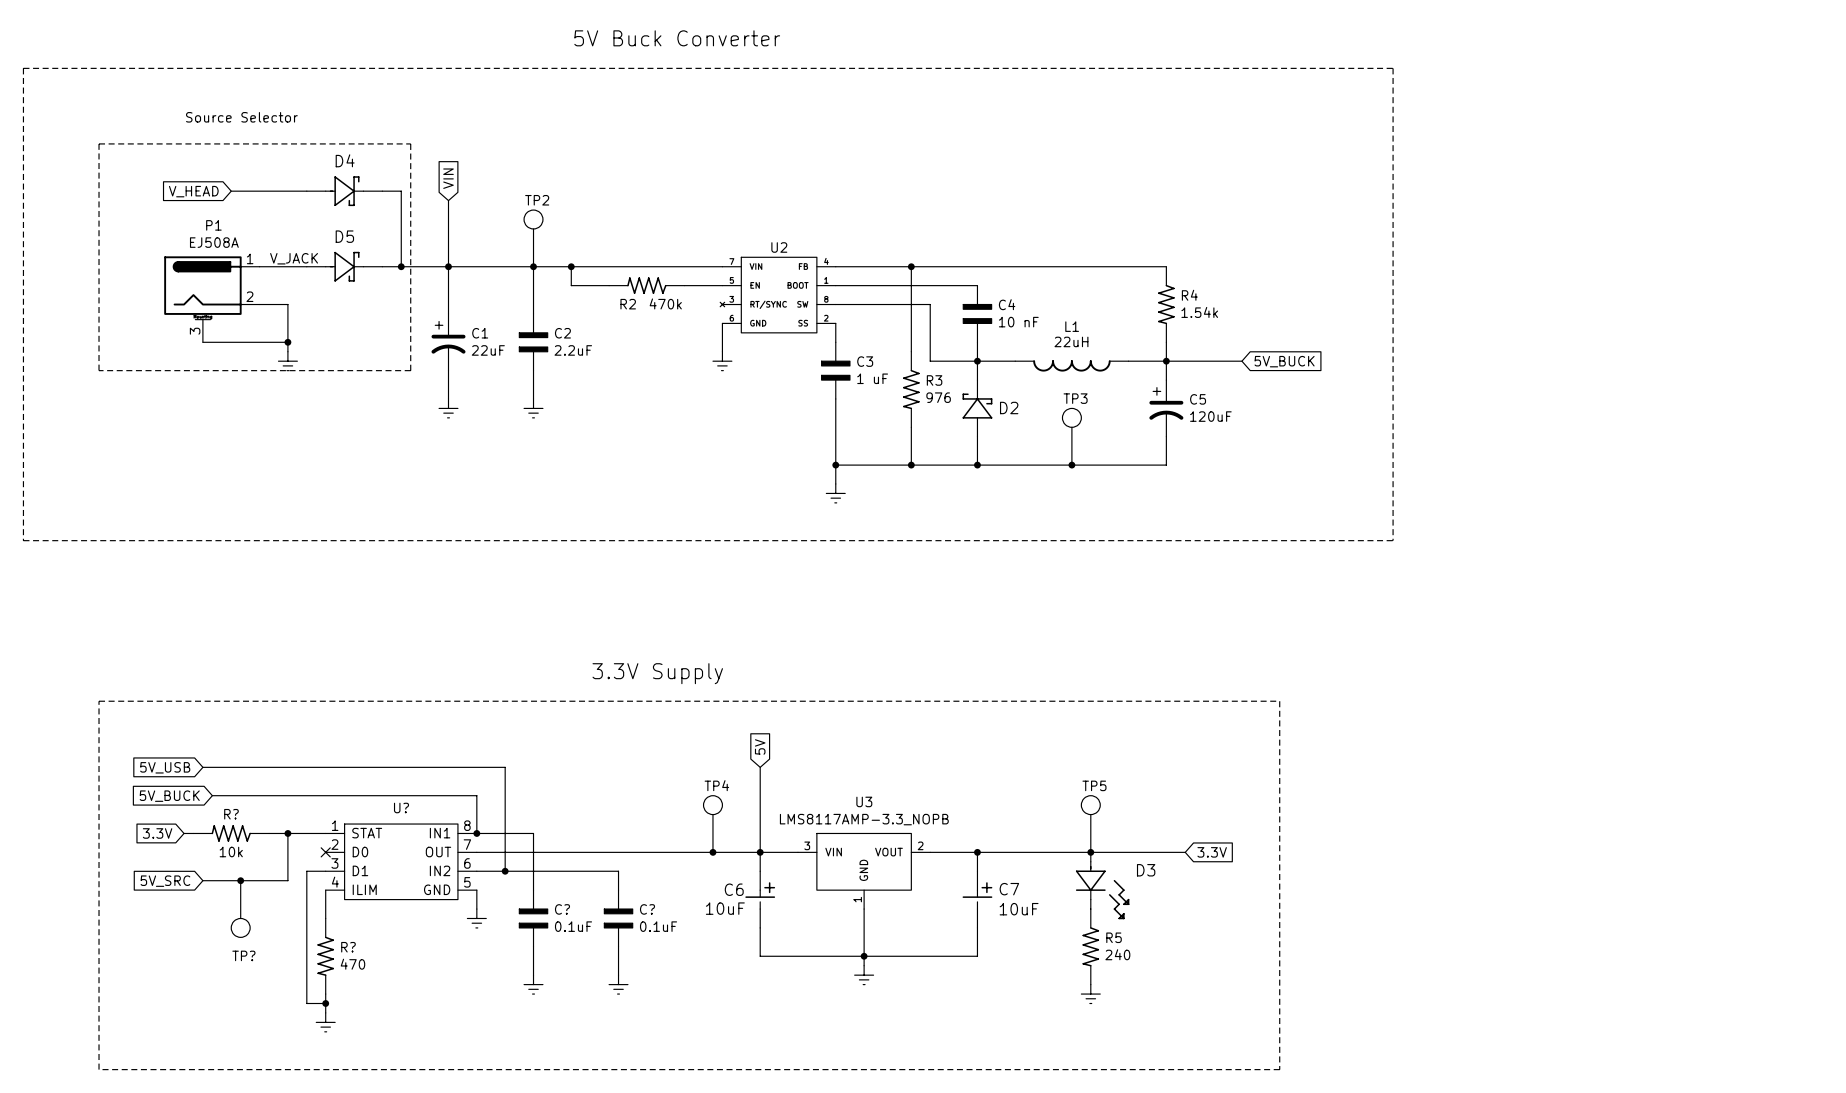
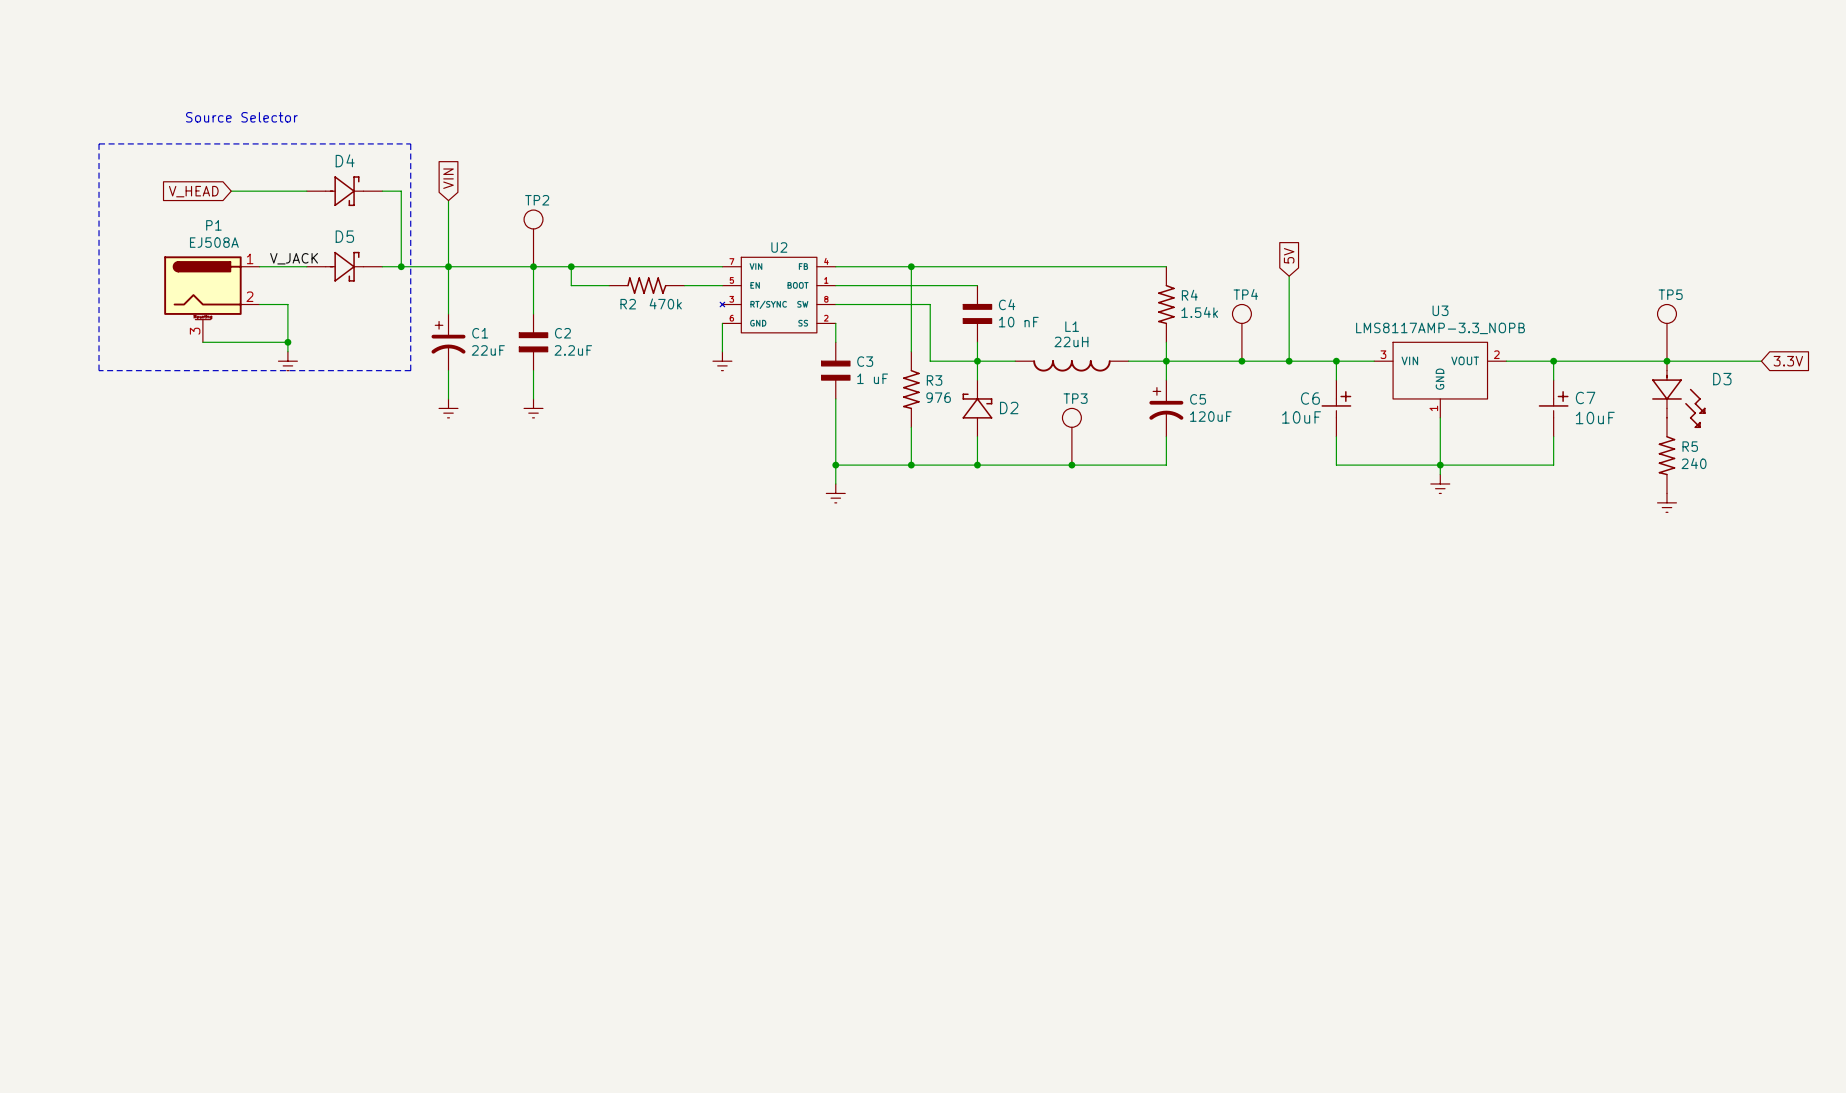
text: 5V Buck Converter (677, 38) -> none
line: (23, 68) (1393, 68) (1393, 540) (23, 540) (23, 68) -> none
global label: none -> 5V (1289, 255)
wire: none -> (1289, 276) (1289, 361)
wire: none -> (1241, 361) (1374, 361)
junction: none -> (1241, 361)
global label: 5V_BUCK (1284, 361) -> none
junction: none -> (1289, 361)
wire: none -> (1336, 361) (1336, 380)
junction: none -> (1336, 361)
wire: none -> (1506, 361) (1761, 361)
wire: none -> (1553, 361) (1553, 380)
junction: none -> (1553, 361)
junction: none -> (1666, 361)
global label: none -> 3.3V (1788, 361)
wire: none -> (1440, 417) (1440, 474)
wire: none -> (1336, 436) (1336, 465) (1553, 465) (1553, 436)
junction: none -> (1440, 465)
power symbol: none -> (1440, 483)
power symbol: none -> (1666, 502)
text: 3.3V Supply (657, 673) -> none
line: (99, 701) (99, 1069) (1279, 1069) (1279, 701) (99, 701) -> none
global label: 5V (760, 746) -> none
global label: 5V_USB (165, 767) -> none
wire: (202, 767) (505, 767) (505, 871) -> none
wire: (760, 767) (760, 871) -> none
wire: (212, 795) (476, 795) (476, 833) (533, 833) (533, 890) -> none
global label: 5V_BUCK (169, 796) -> none
TP4 position: (712, 824) -> (1241, 332)
TP5 position: (1090, 824) -> (1666, 332)
global label: 3.3V (157, 833) -> none
wire: (184, 833) (193, 833) -> none
R?: 10k (231, 833) -> none
wire: (269, 833) (325, 833) -> none
wire: (287, 833) (287, 880) (202, 880) -> none
junction: (287, 833) -> none
junction: (476, 833) -> none
no-connect mark: (325, 852) -> none
wire: (476, 852) (797, 852) -> none
junction: (712, 852) -> none
junction: (760, 852) -> none
wire: (930, 852) (1185, 852) -> none
wire: (977, 852) (977, 871) -> none
junction: (977, 852) -> none
junction: (1090, 852) -> none
global label: 3.3V (1212, 852) -> none
U?: (401, 861) -> none
wire: (325, 871) (306, 871) (306, 1003) (325, 1003) -> none
wire: (476, 871) (618, 871) (618, 890) -> none
junction: (505, 871) -> none
U3 position: (864, 871) -> (1440, 380)
junction: (240, 880) -> none
global label: 5V_SRC (165, 881) -> none
D3 position: (1102, 885) -> (1678, 394)
wire: (325, 890) (325, 918) -> none
wire: (476, 890) (476, 909) -> none
C6 position: (760, 899) -> (1336, 408)
C7 position: (977, 899) -> (1553, 408)
TP?: (240, 909) -> none
wire: (864, 909) (864, 965) -> none
power symbol: (476, 918) -> none
C?: 0.1uF (533, 918) -> none
C?: 0.1uF (618, 918) -> none
wire: (760, 927) (760, 956) (977, 956) (977, 927) -> none
wire: (533, 946) (533, 975) -> none
wire: (618, 946) (618, 975) -> none
R5 position: (1090, 946) -> (1666, 455)
R?: 470 (325, 956) -> none
junction: (864, 956) -> none
power symbol: (864, 975) -> none
power symbol: (533, 984) -> none
power symbol: (618, 984) -> none
wire: (325, 994) (325, 1012) -> none
power symbol: (1090, 994) -> none
junction: (325, 1003) -> none
power symbol: (325, 1022) -> none

